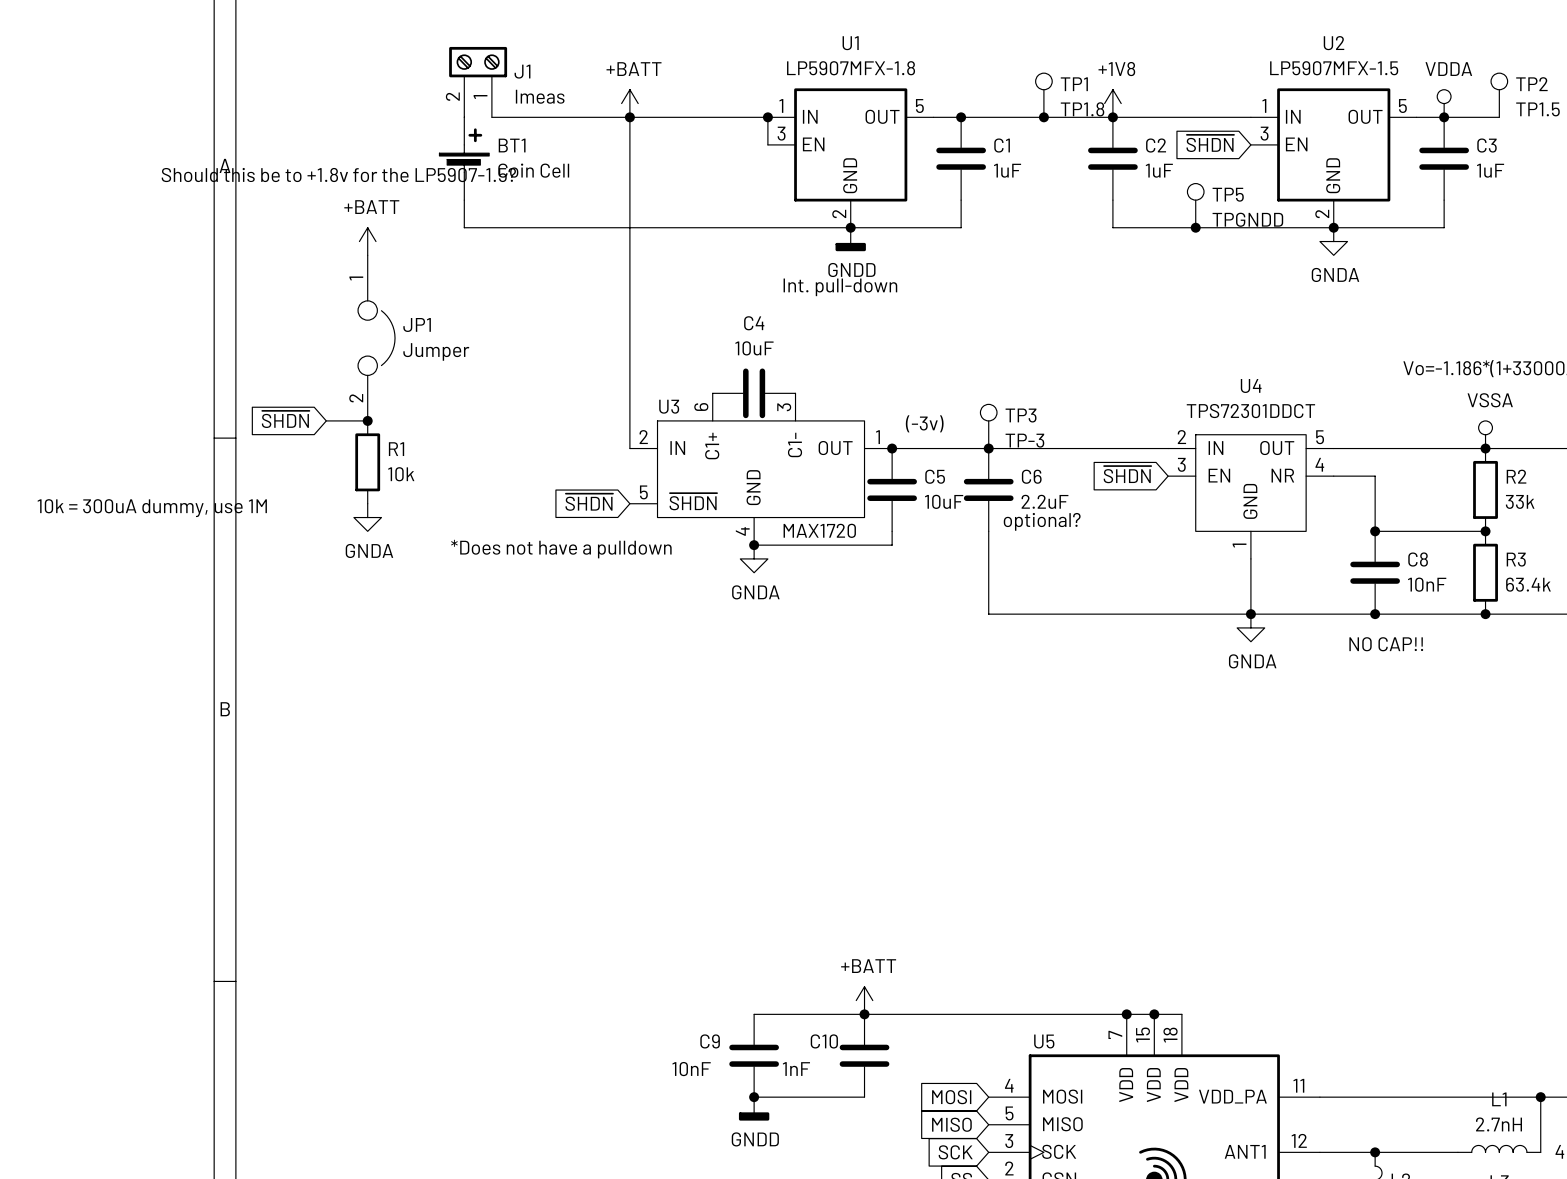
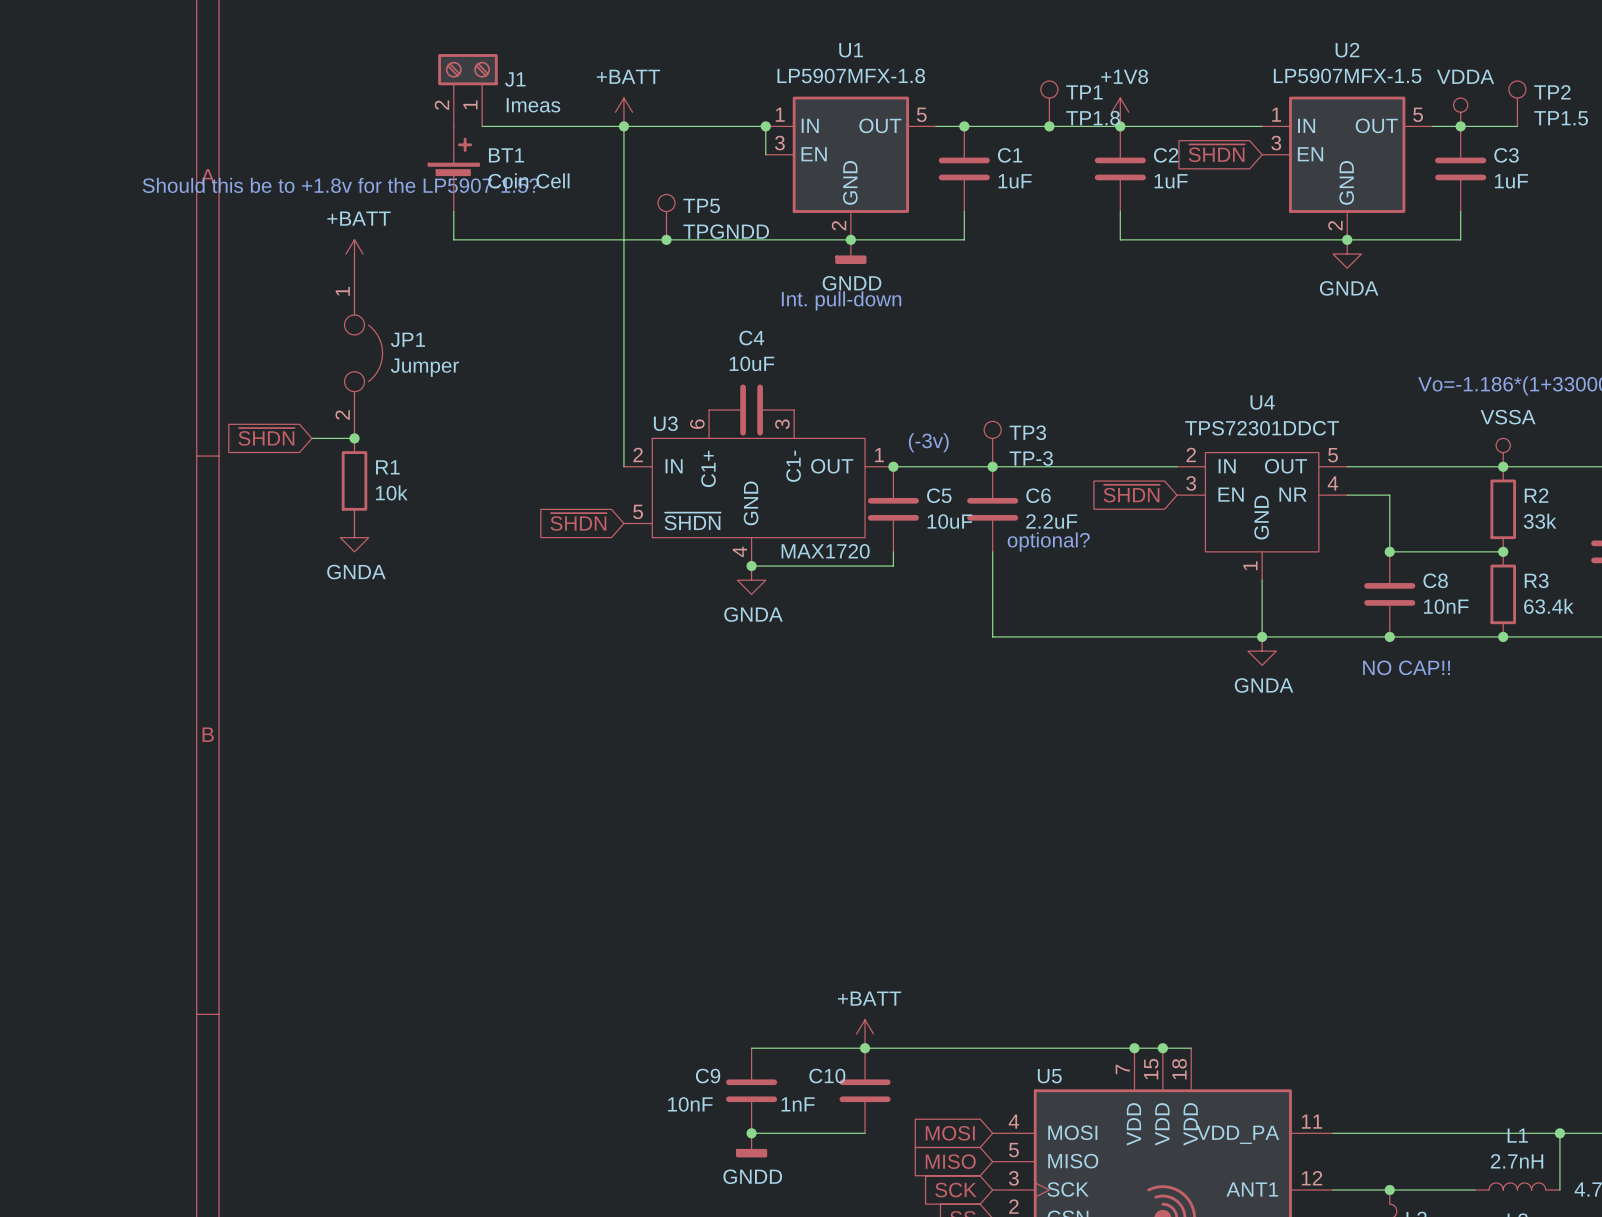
TP5 position: (1195, 205) -> (666, 217)
junction: none -> (666, 239)
junction: (1195, 227) -> none
text: 10k = 300uA dummy, use 1M (152, 508) -> none
text: *Does not have a pulldown (561, 549) -> none

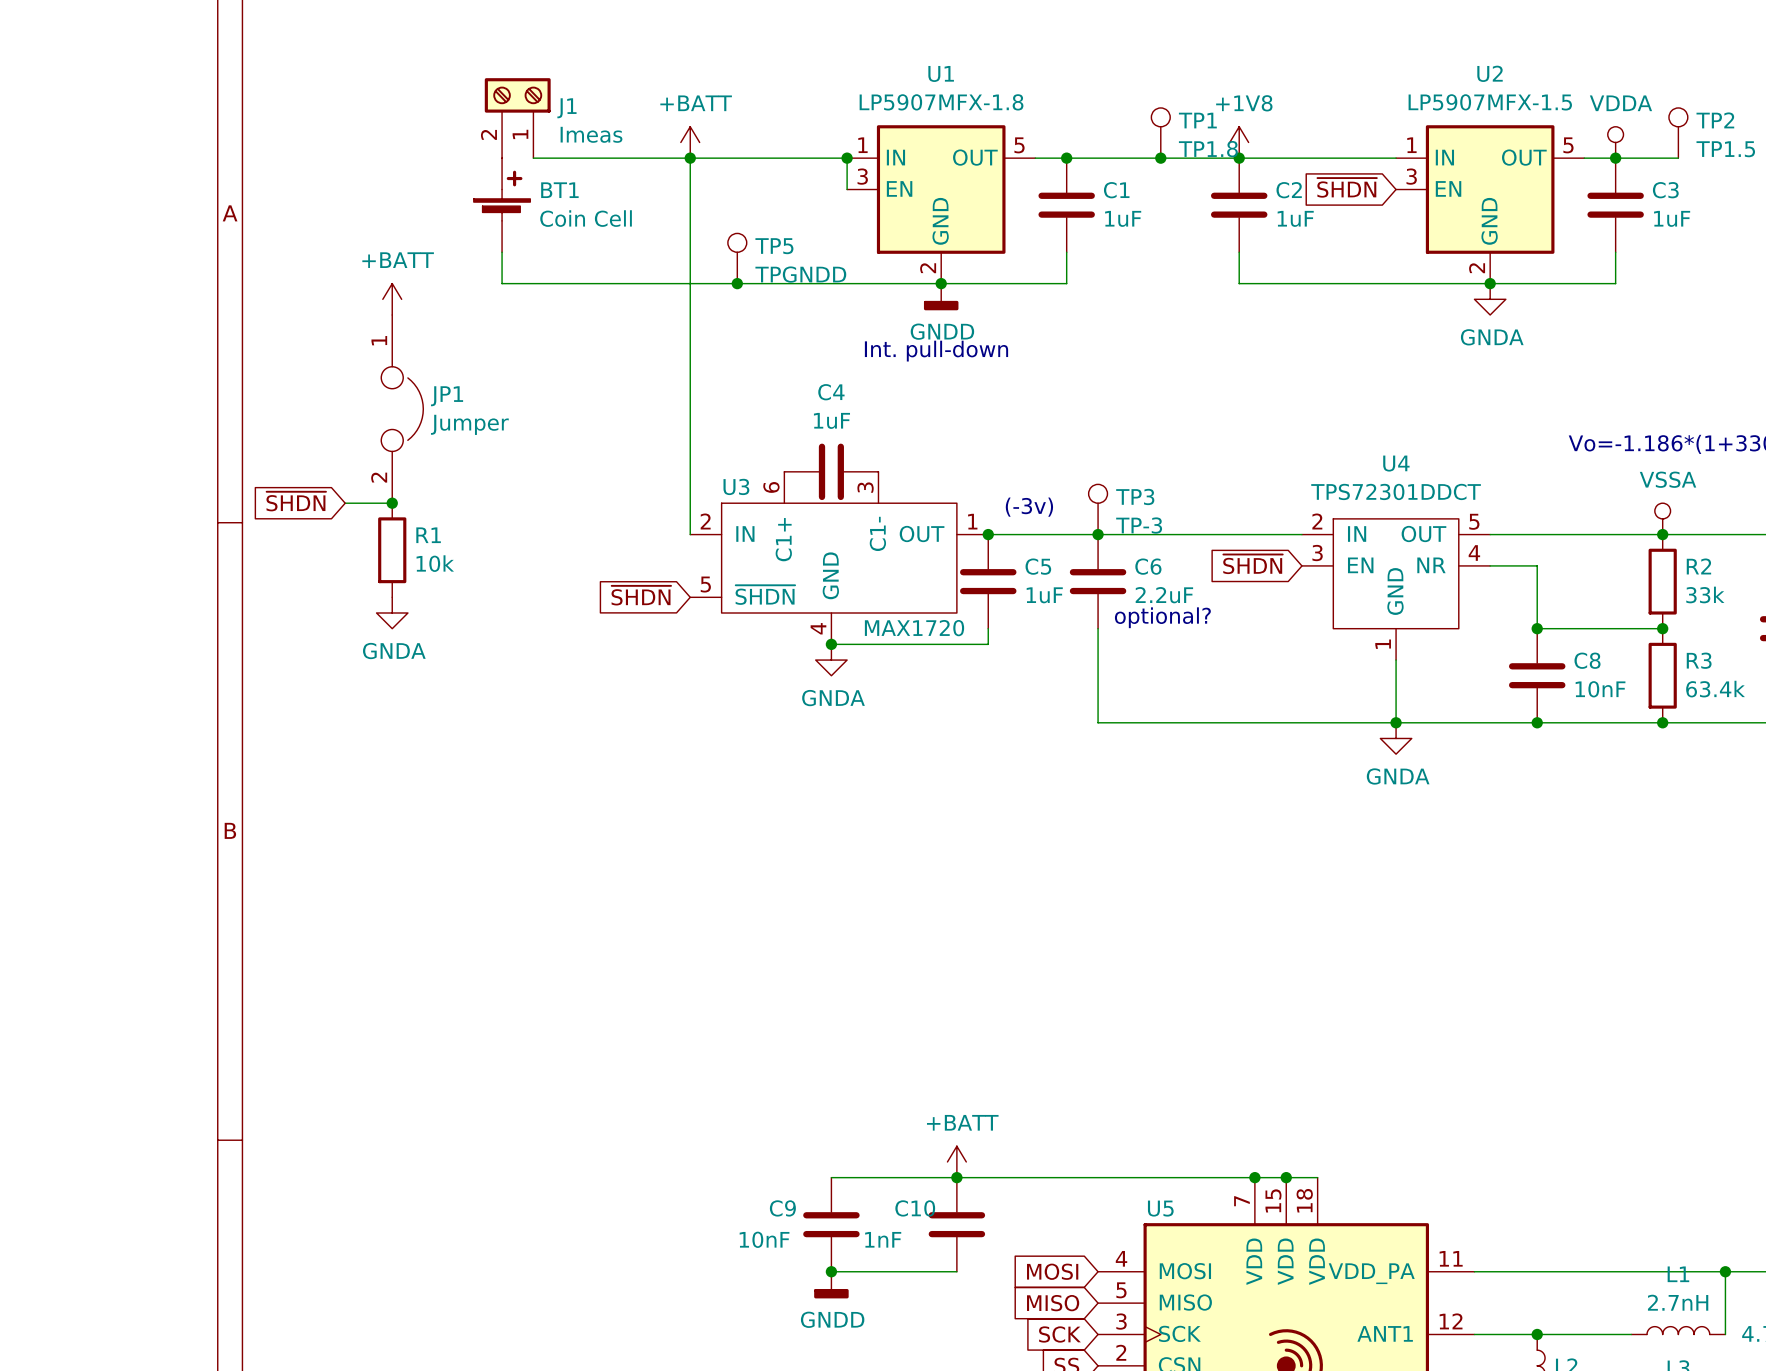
text: Should this be to +1.8v for the LP5907-1.5? (340, 185) -> none
C4 value: 10uF (751, 363) -> 1uF (831, 420)
C5 value: 10uF (949, 521) -> 1uF (1044, 595)
text: NO CAP!! (1406, 667) -> none

